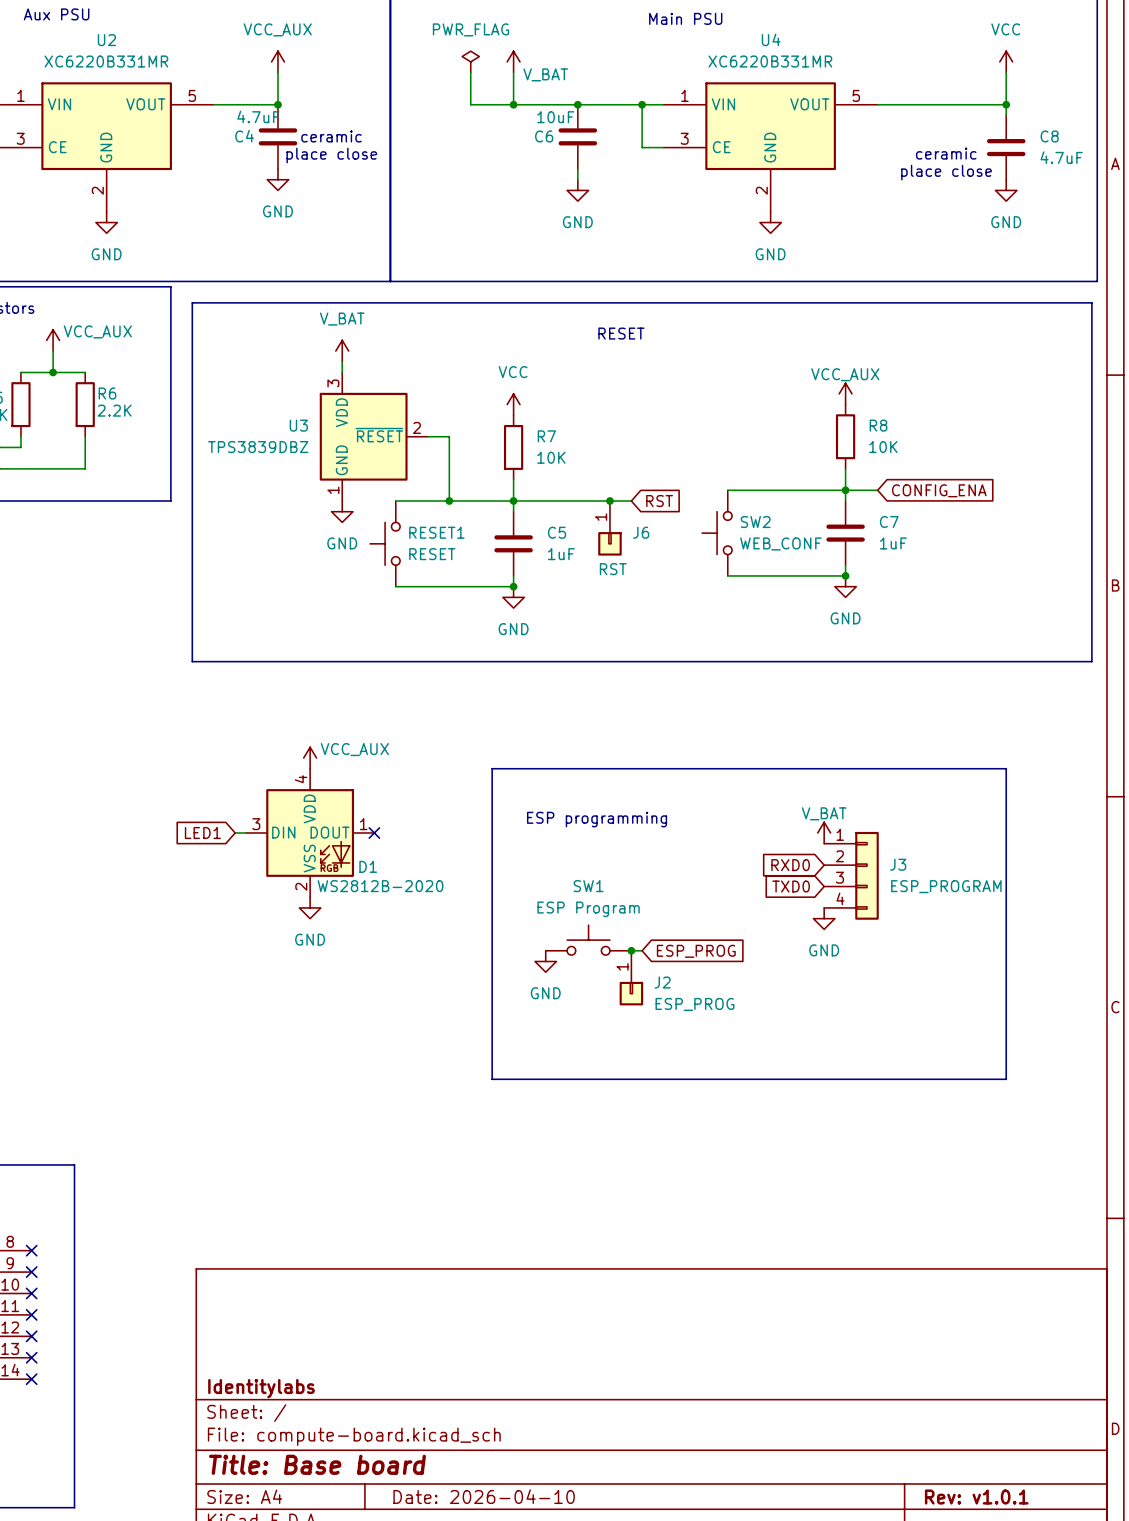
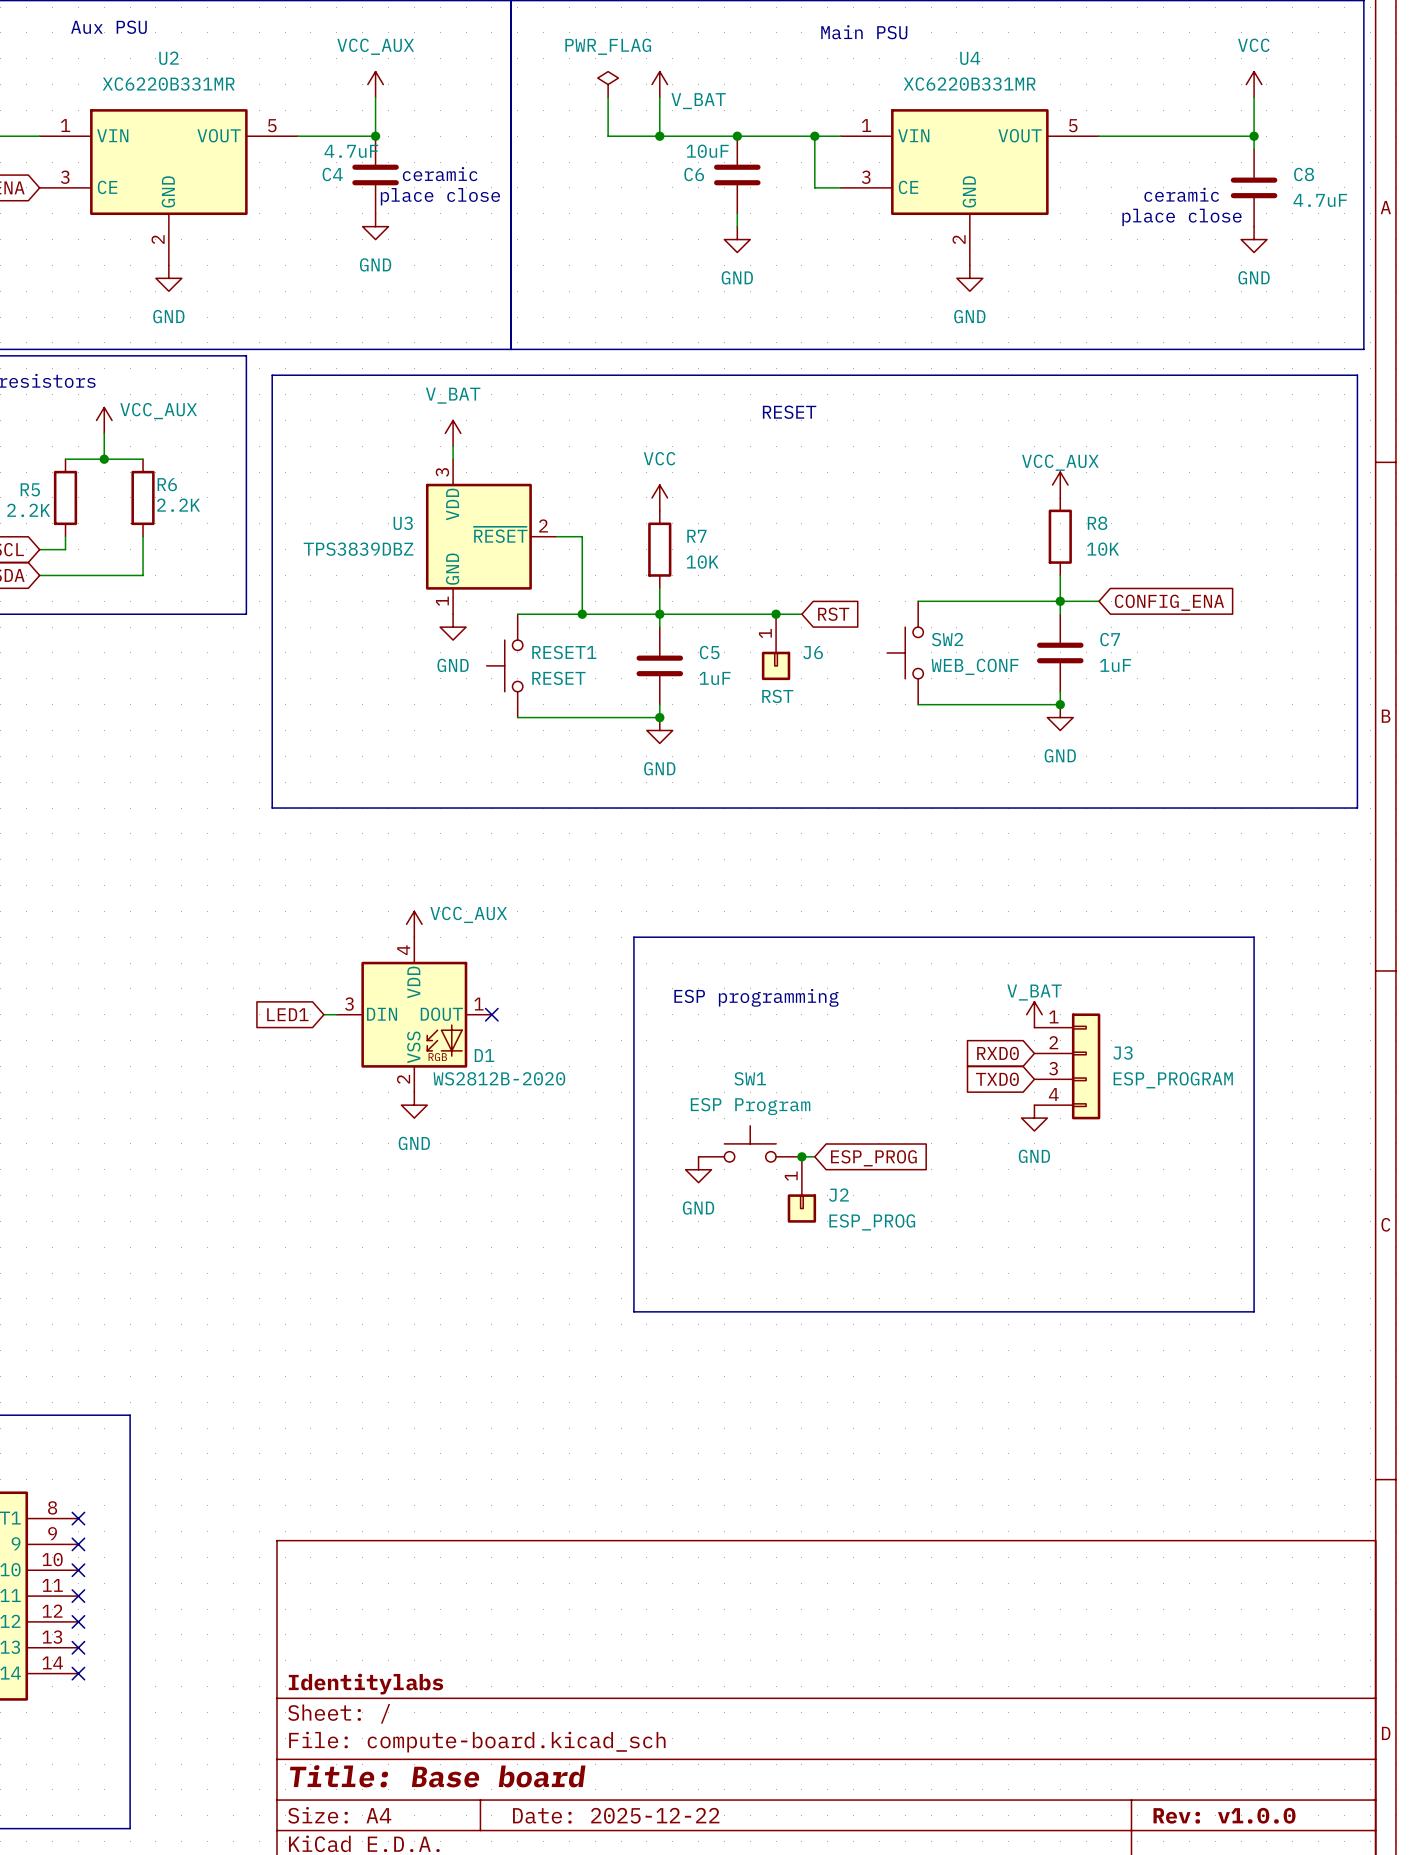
title block: Date: 2026-04-10 (484, 1496) -> Date: 2025-12-22 (616, 1815)
title block: Rev: v1.0.1 (976, 1497) -> Rev: v1.0.0 (1224, 1815)

